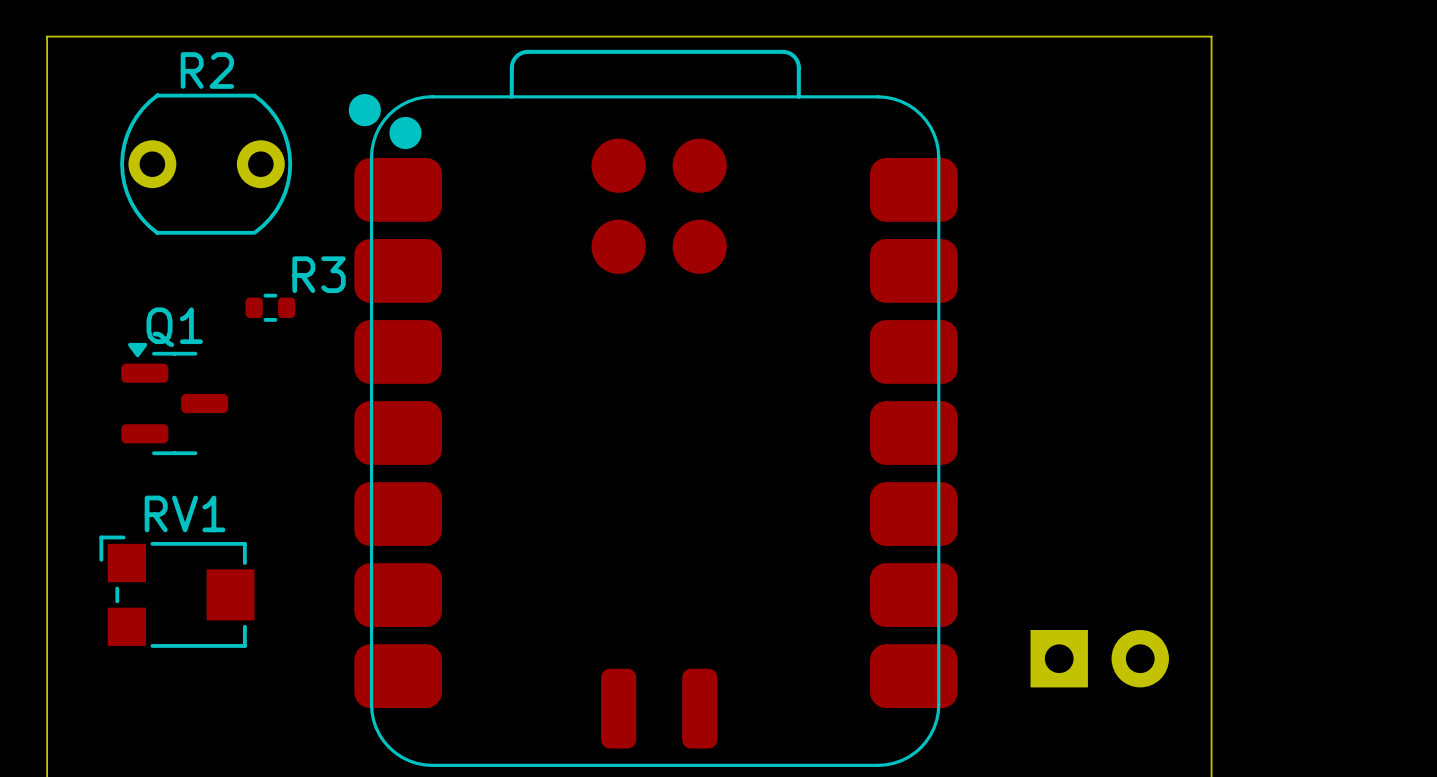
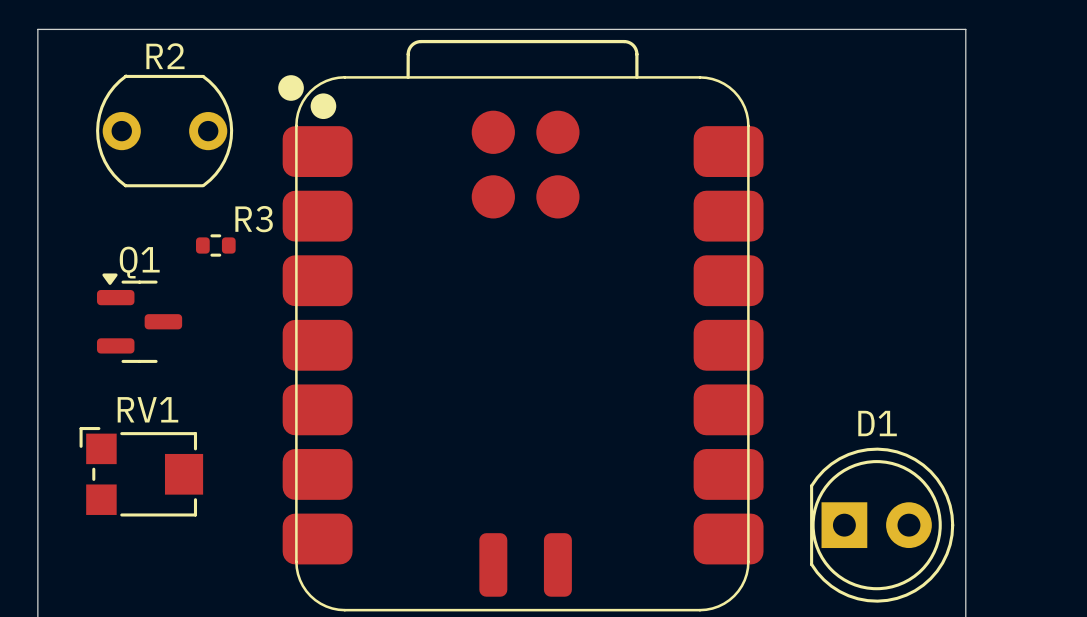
D1 side: bottom (1099, 658) -> top (882, 525)

